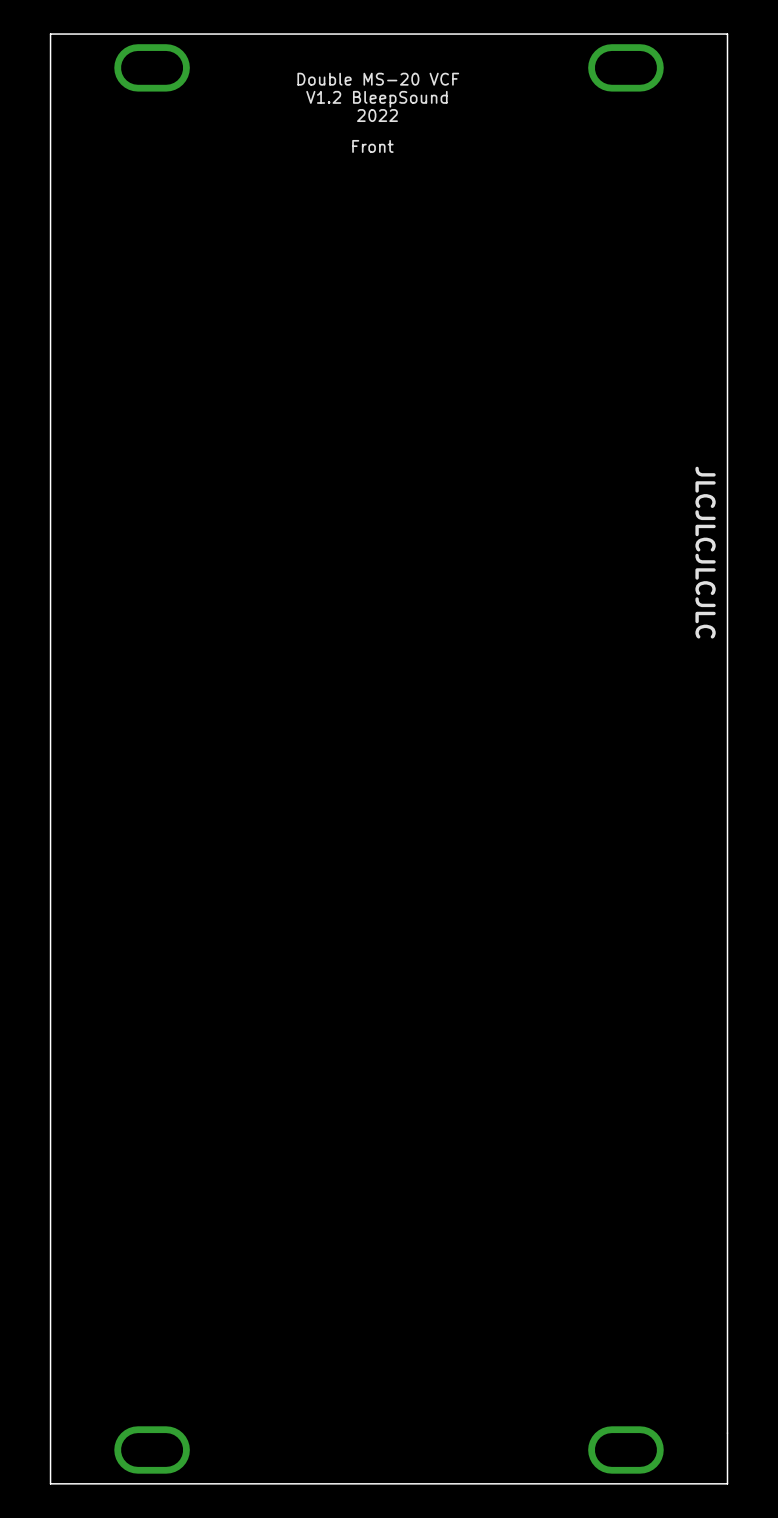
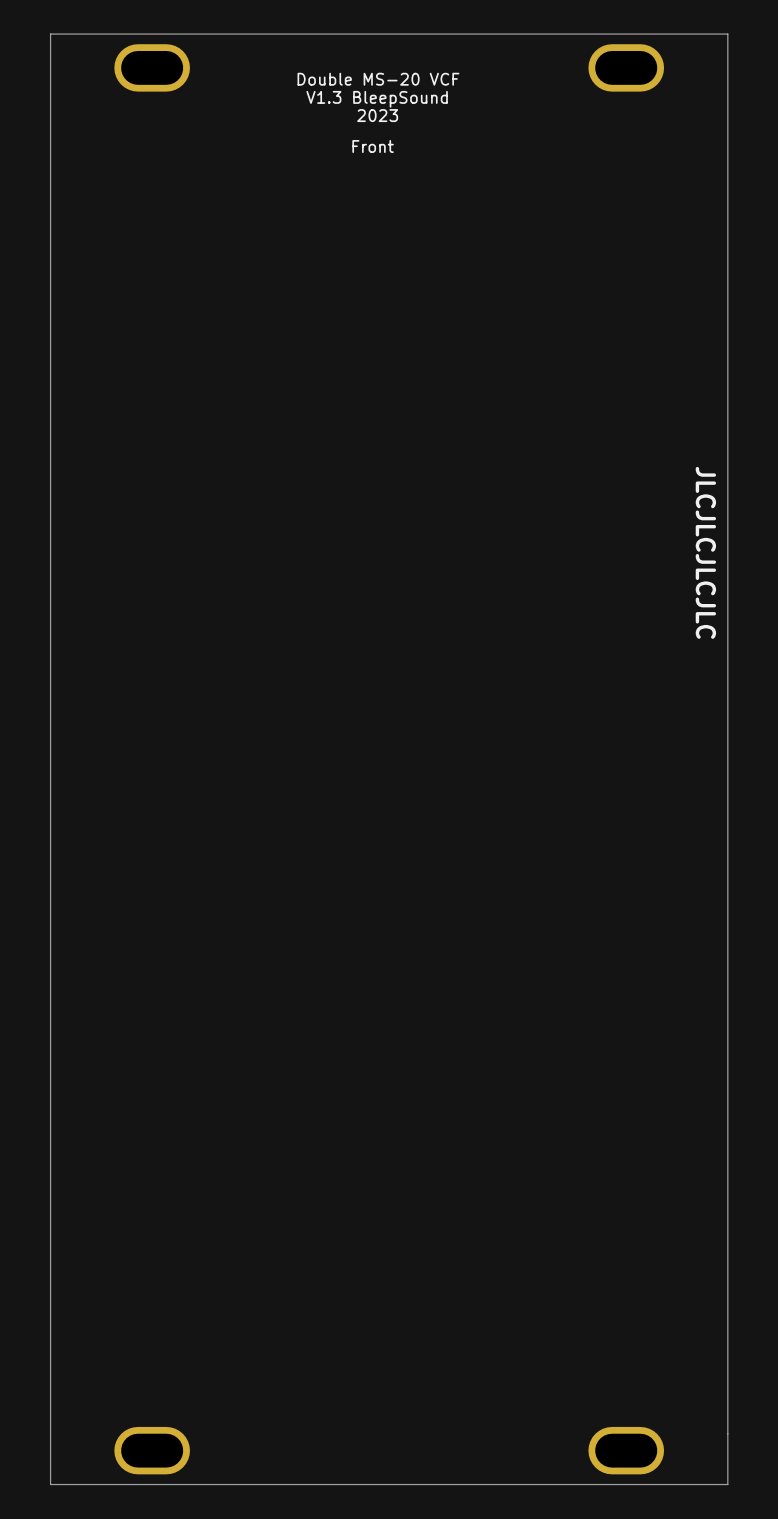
text: V1.2 BleepSound (376, 99) -> V1.3 BleepSound (377, 99)
text: 2022 (377, 115) -> 2023 (377, 115)

